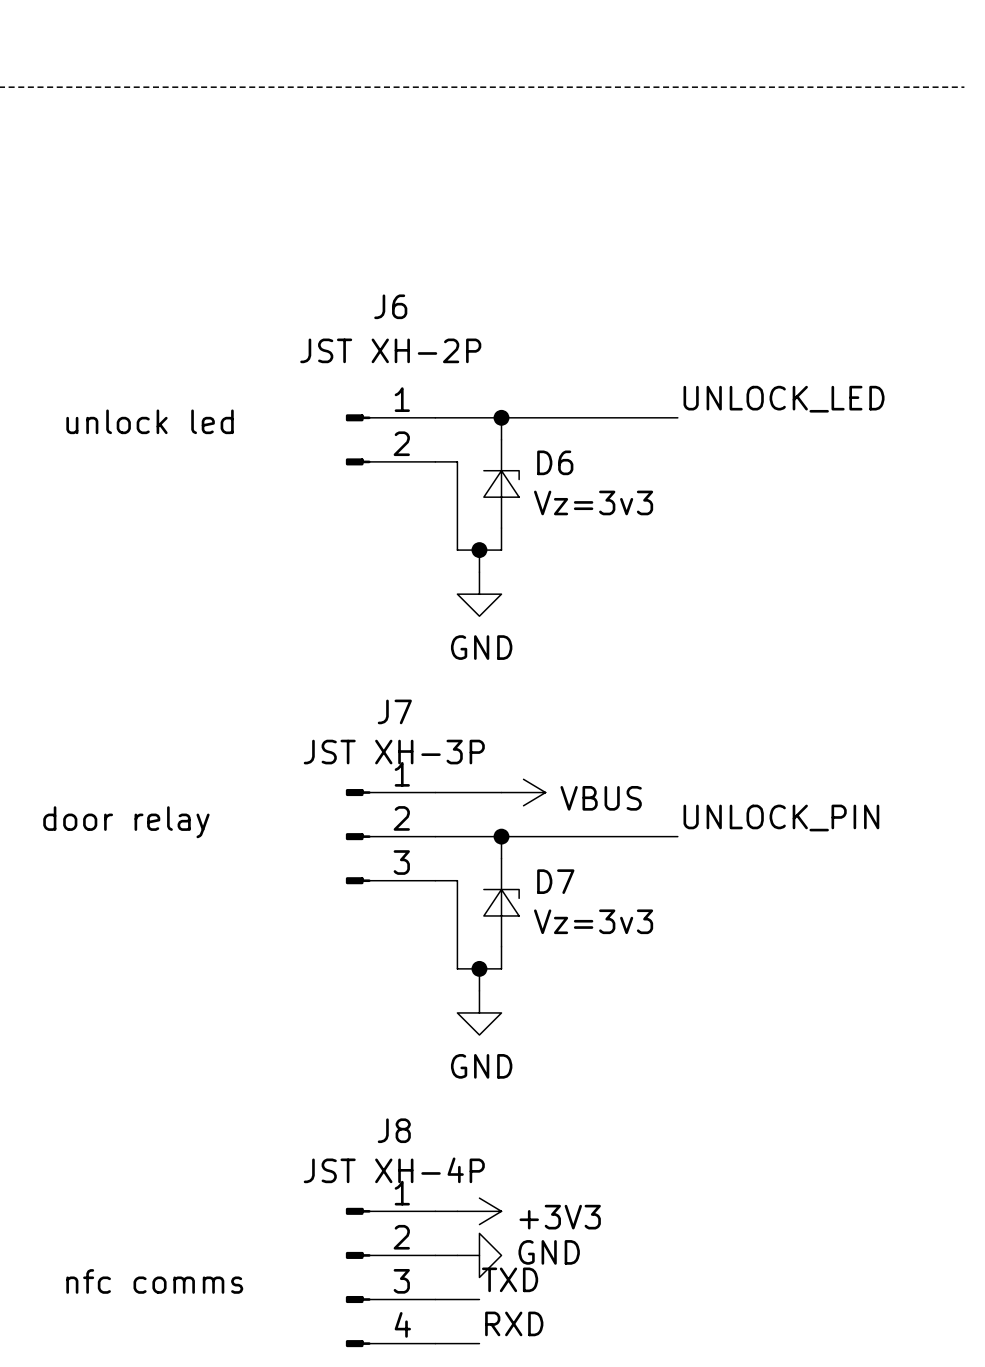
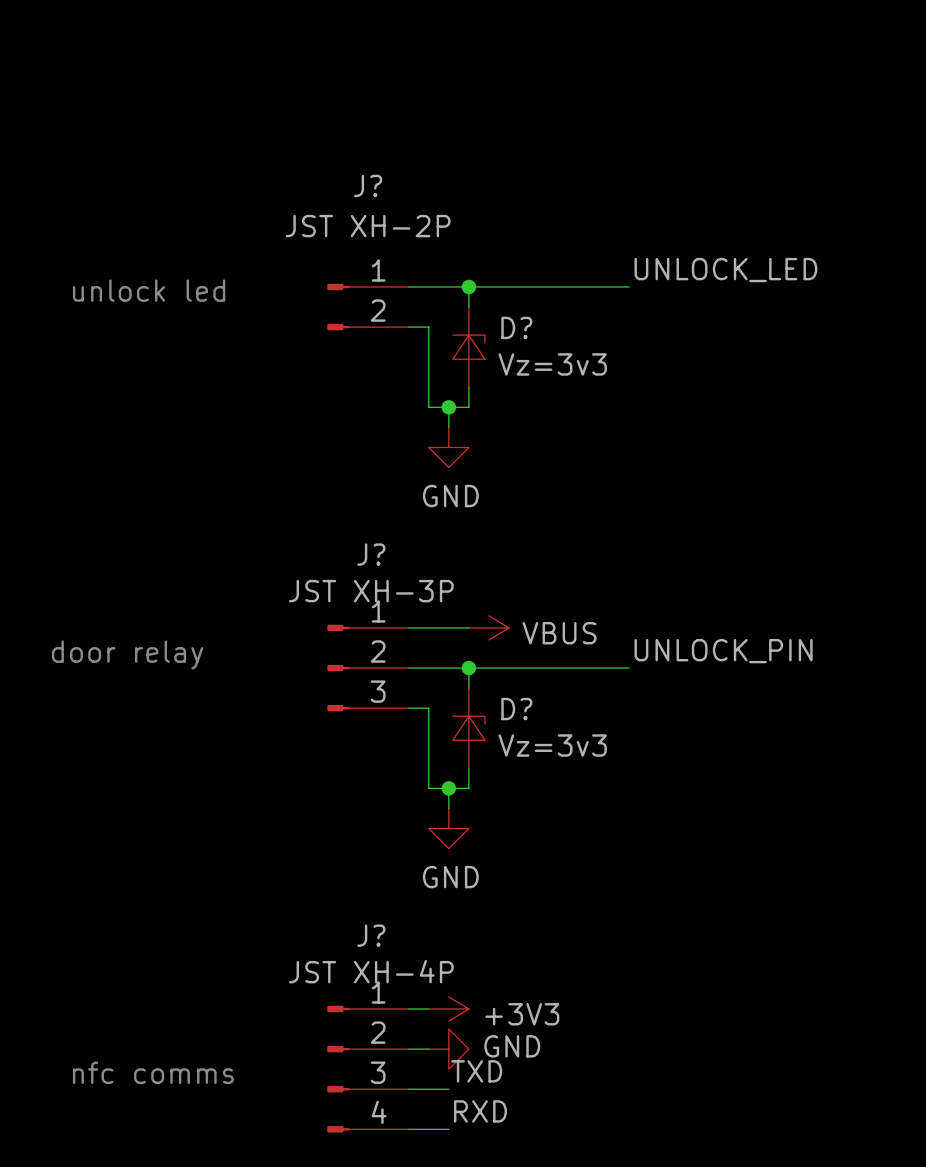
J6 name: J6 (390, 306) -> J? (368, 185)
D6 name: D6 (555, 462) -> D? (516, 327)
J7 name: J7 (394, 711) -> J? (371, 554)
D7 name: D7 (555, 881) -> D? (516, 709)
J8 name: J8 (394, 1130) -> J? (371, 935)

